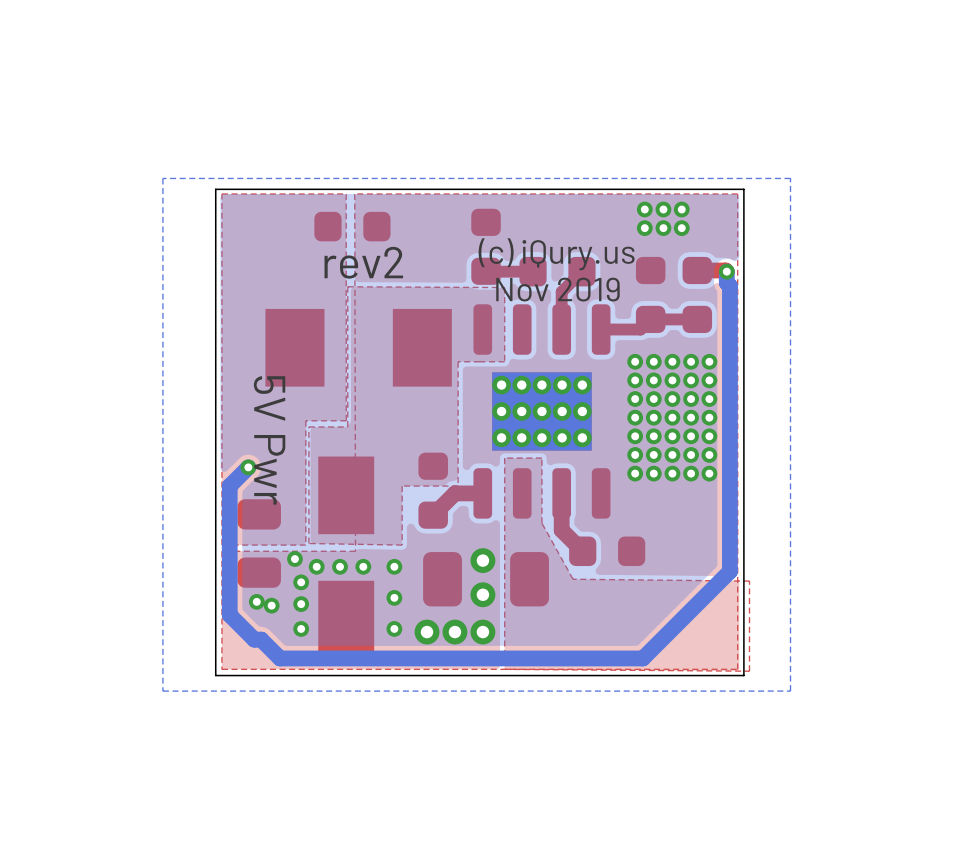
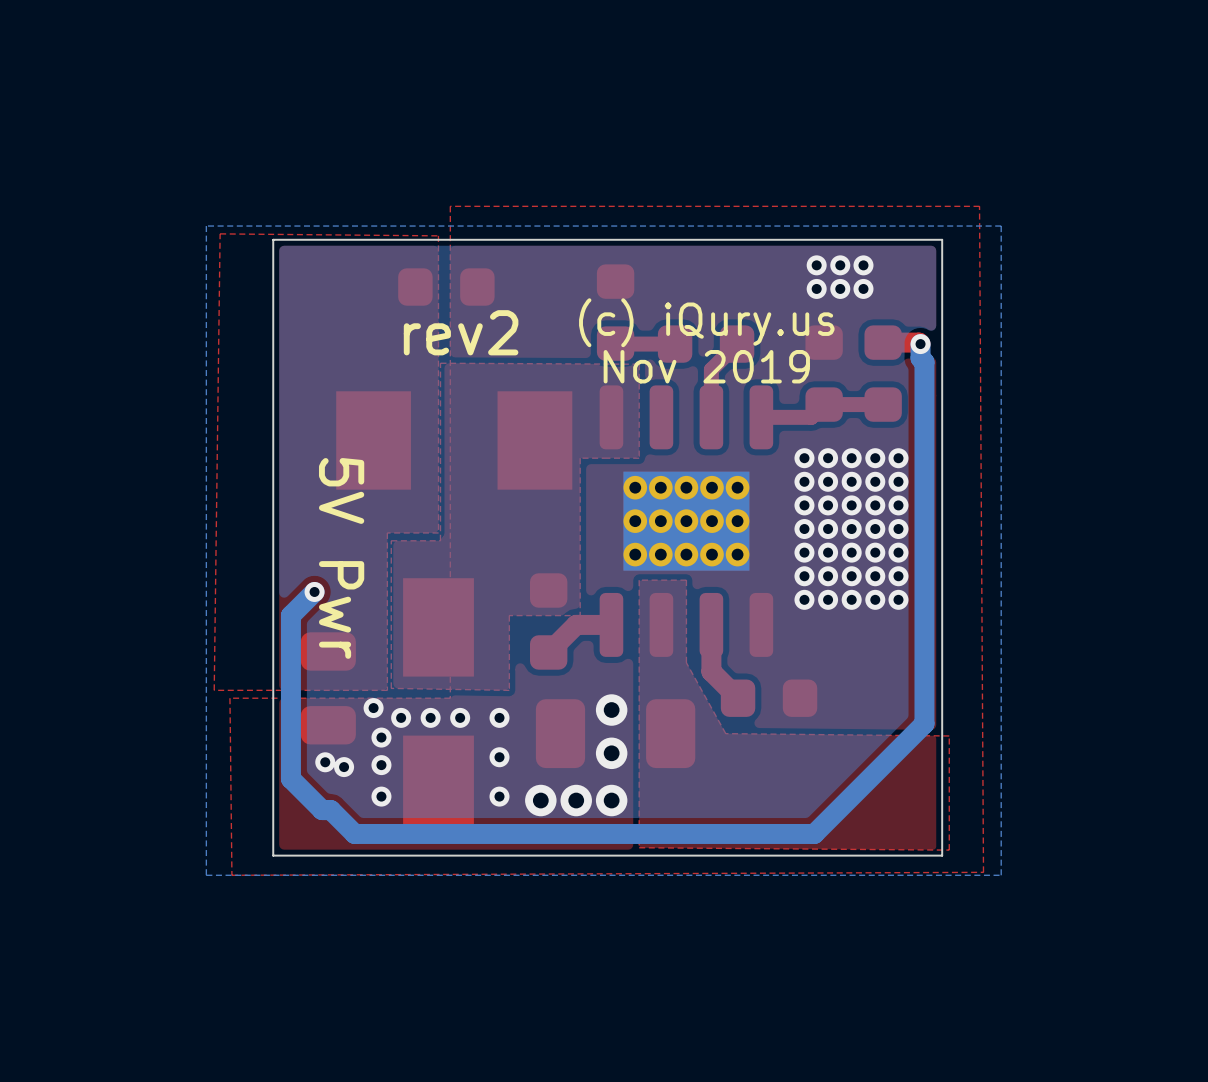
top zone outline: (346, 193) (221, 193) (221, 545) -> (438, 245) (438, 235) (220, 233) (214, 690) (281, 690)
top zone outline: (355, 551) (354, 193) (737, 193) (737, 669) (221, 669) (221, 551) -> (450, 698) (450, 206) (979, 206) (983, 872) (231, 875) (229, 698) (281, 698)

